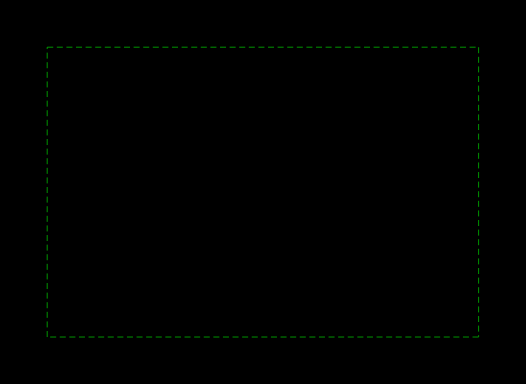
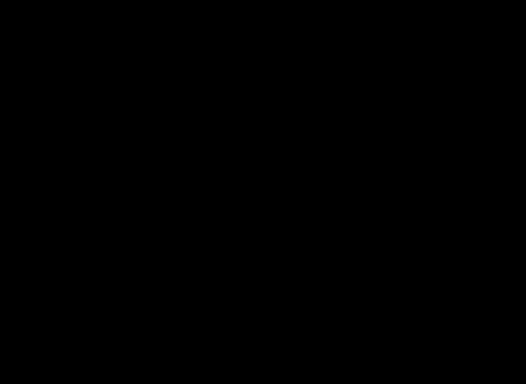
bottom zone outline: (47, 47) (47, 337) (478, 337) (478, 47) (47, 47) -> none

